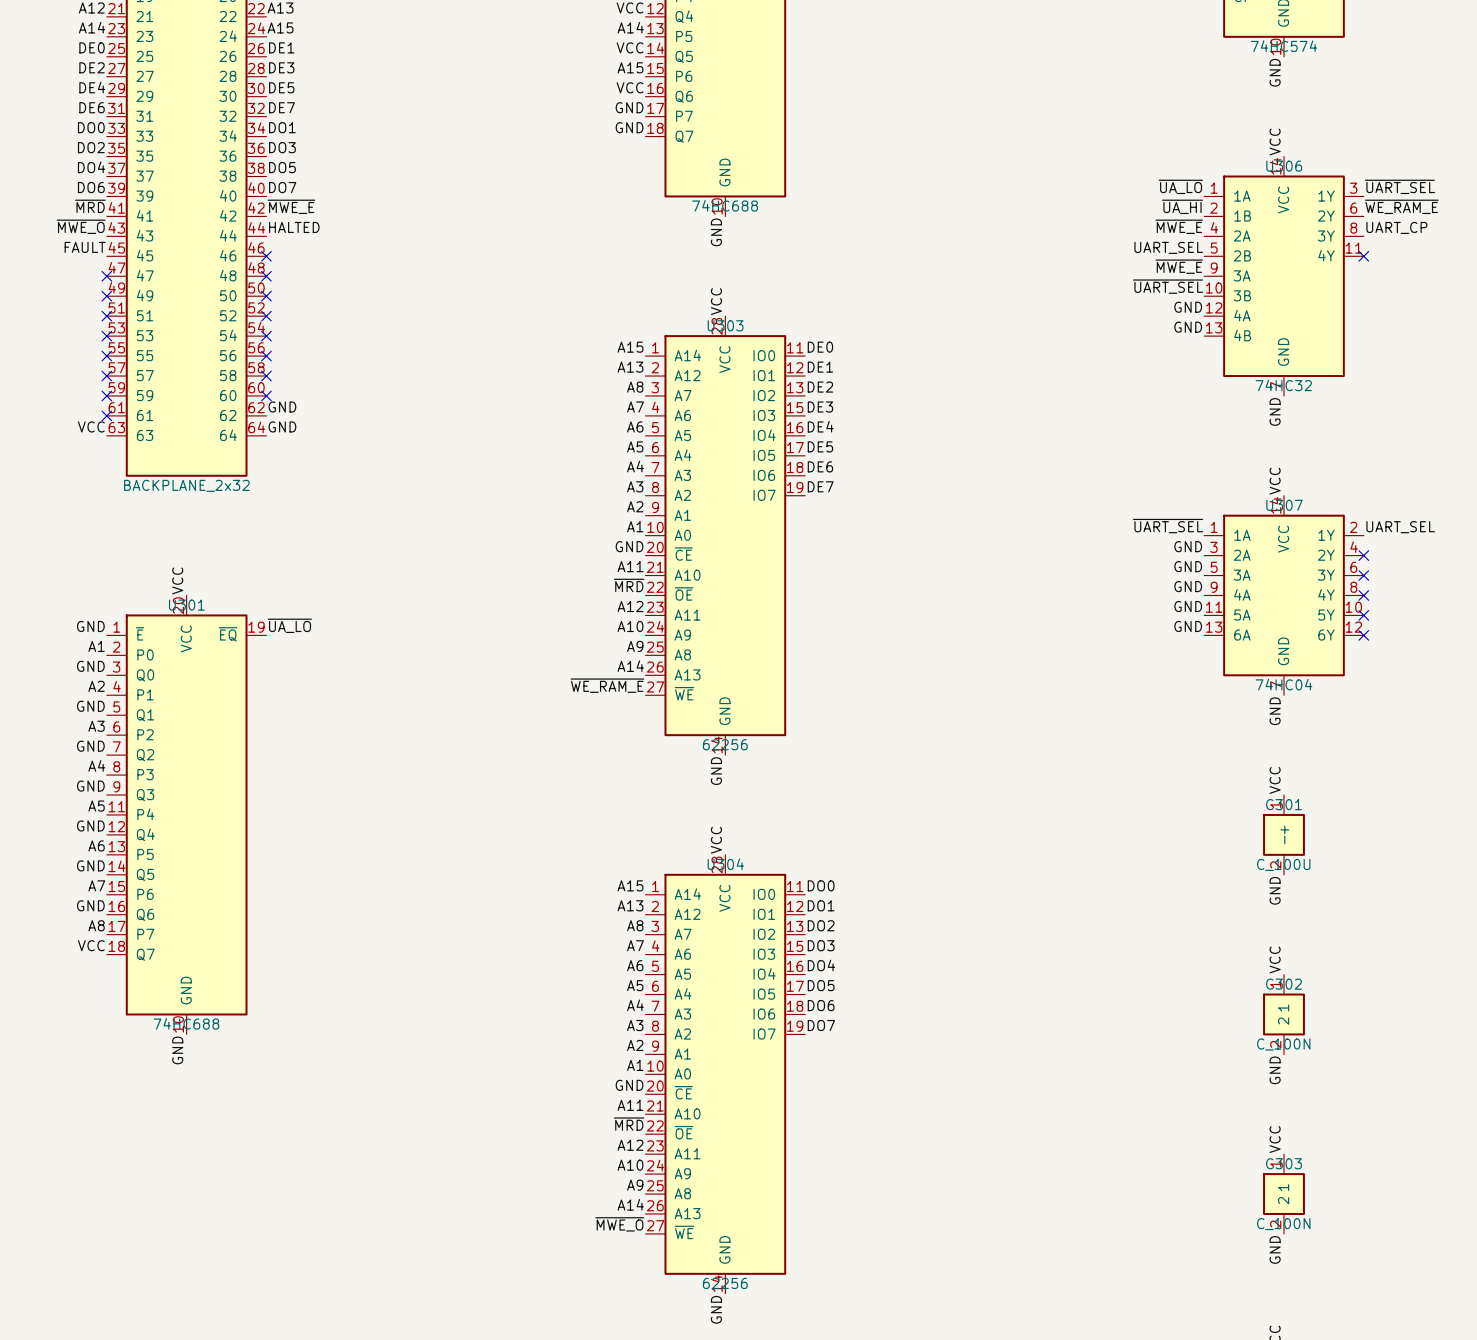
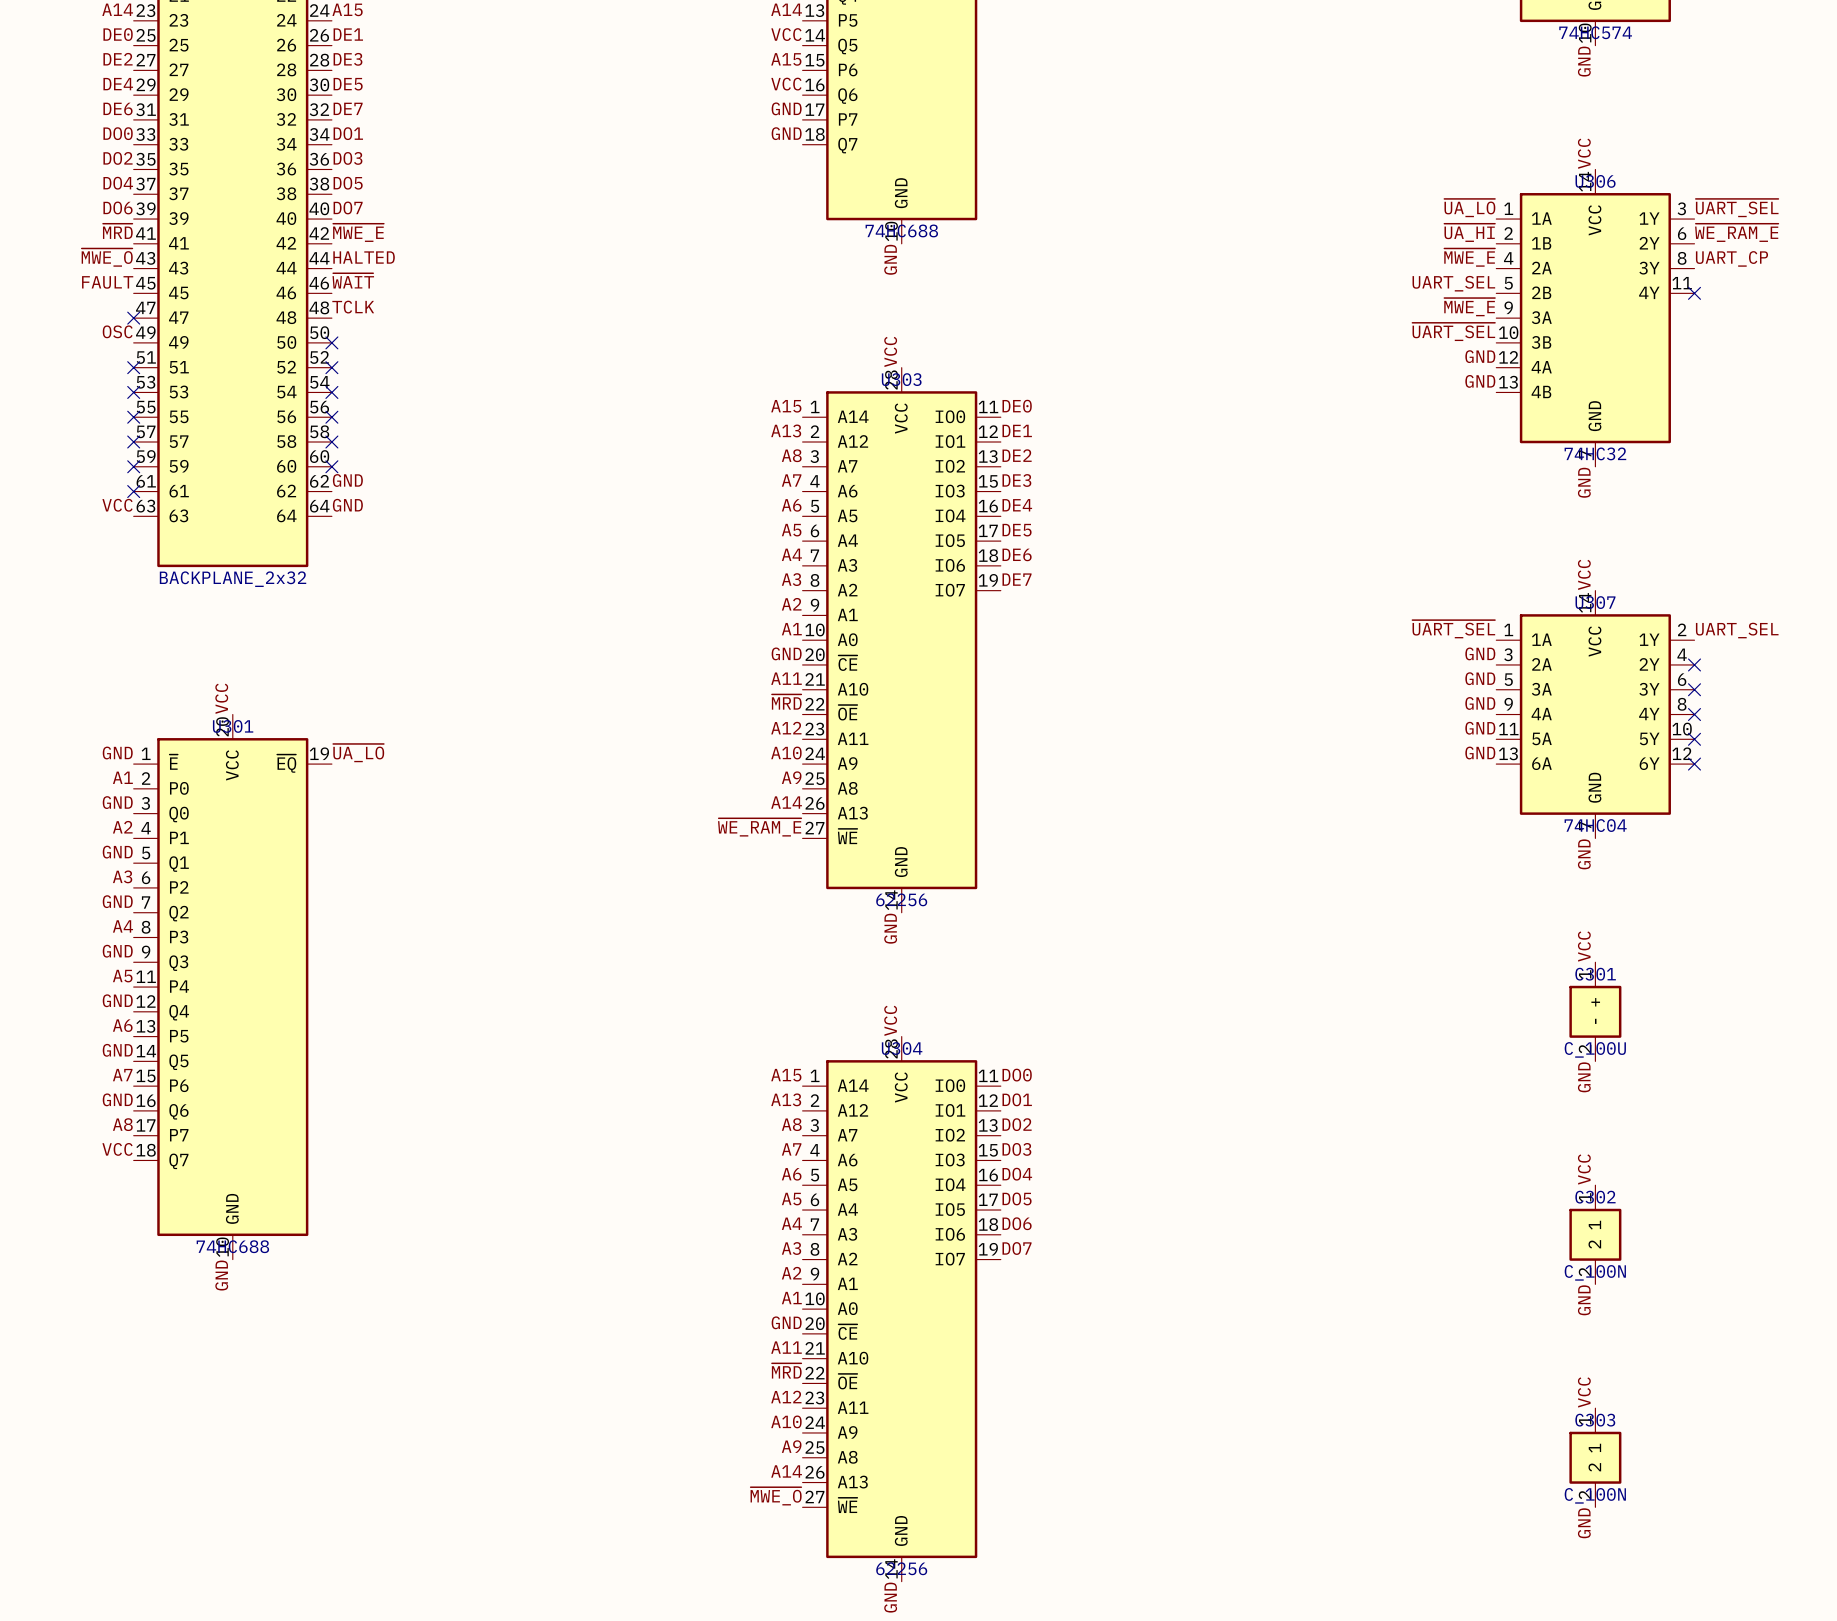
label: none -> ~{WAIT} (353, 280)
no-connect mark: (266, 256) -> none
label: none -> TCLK (353, 307)
no-connect mark: (266, 276) -> none
label: none -> OSC (117, 331)
no-connect mark: (106, 296) -> none

